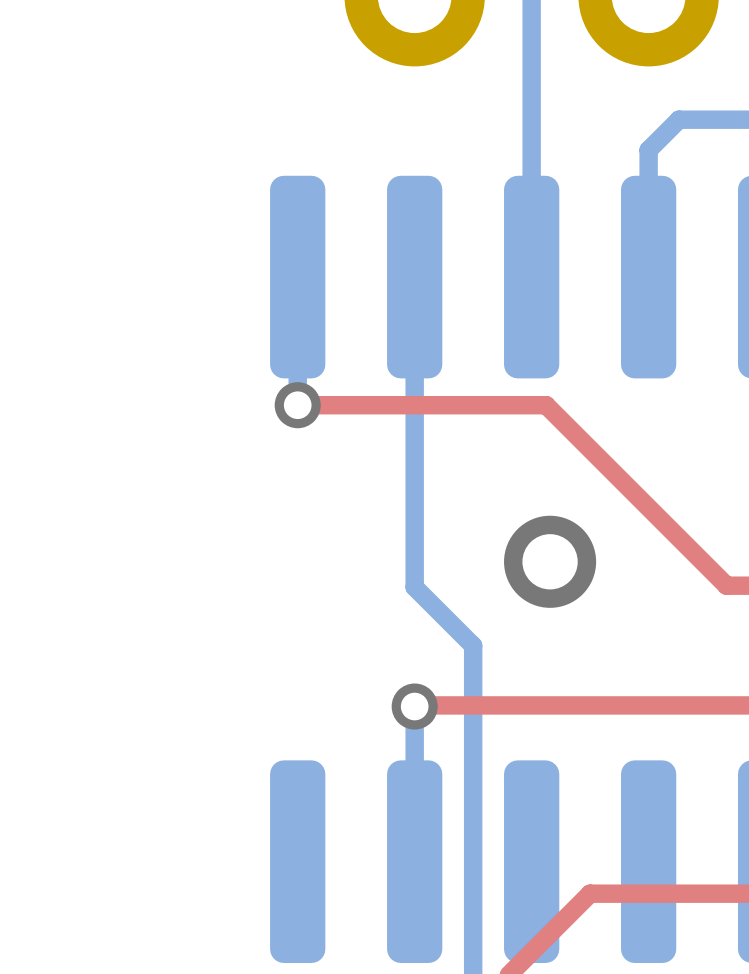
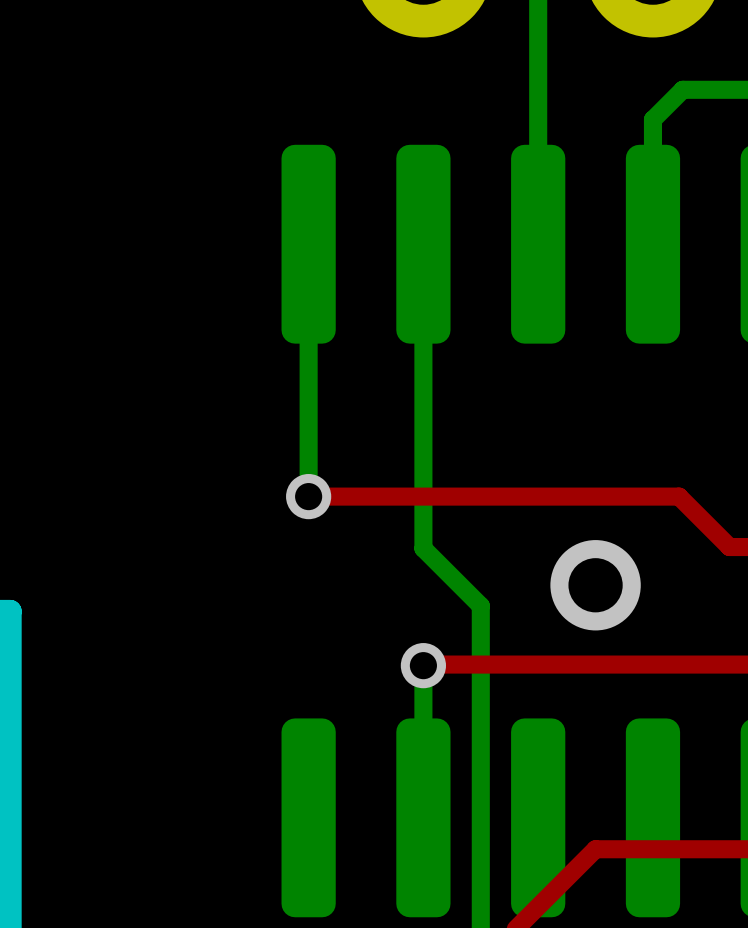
bottom track: none -> (308, 369) (308, 496)
top track: (297, 405) (546, 405) (675, 534) -> (308, 496) (679, 496)
via position: (297, 405) -> (308, 496)
via position: (550, 561) -> (595, 585)

